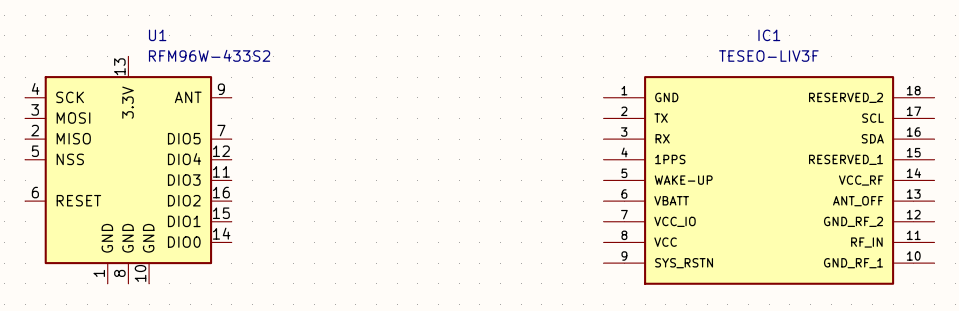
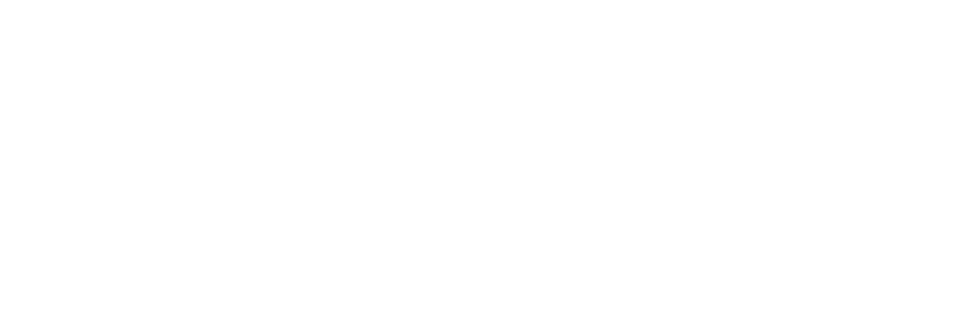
U1: RFM96W-433S2 (128, 170) -> none
IC1: TESEO-LIV3F (769, 180) -> none

